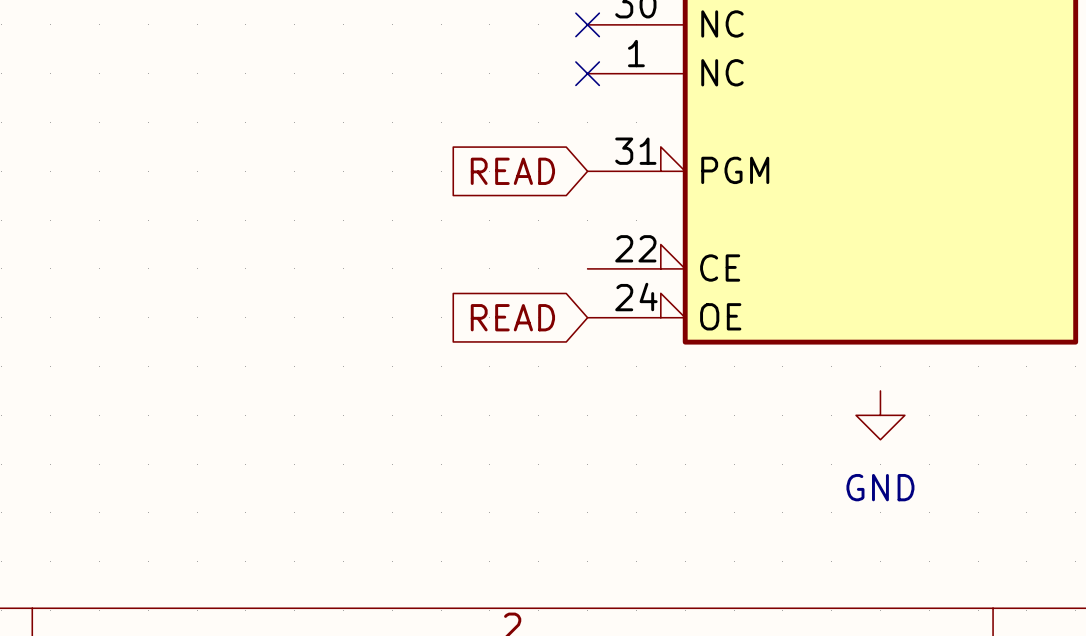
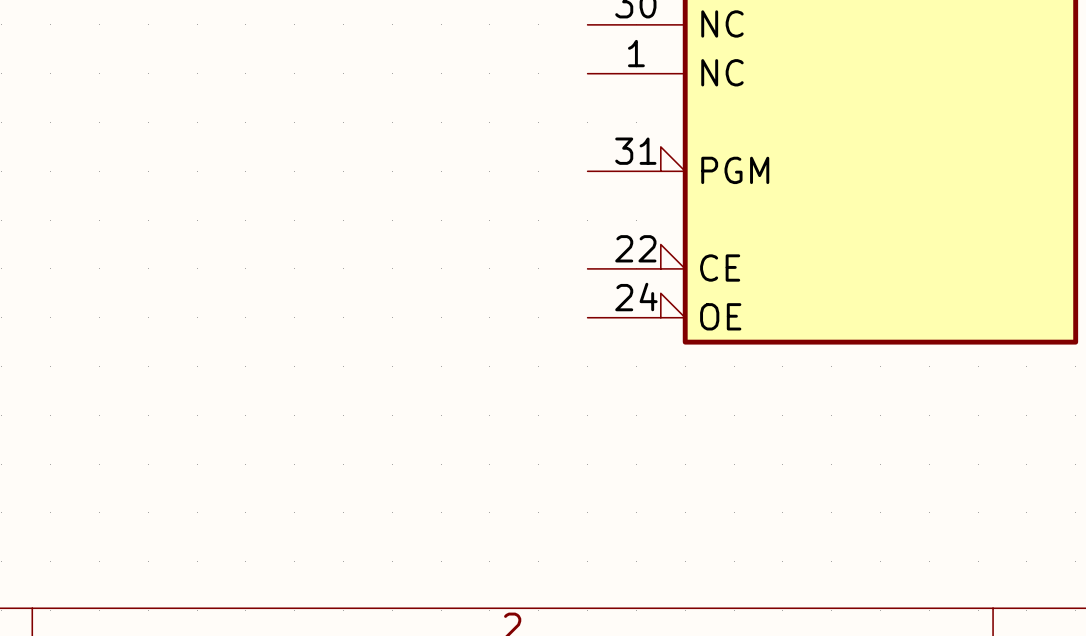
no-connect mark: (587, 24) -> none
no-connect mark: (587, 73) -> none
global label: READ (512, 171) -> none
global label: READ (512, 317) -> none
power symbol: GND (880, 415) -> none

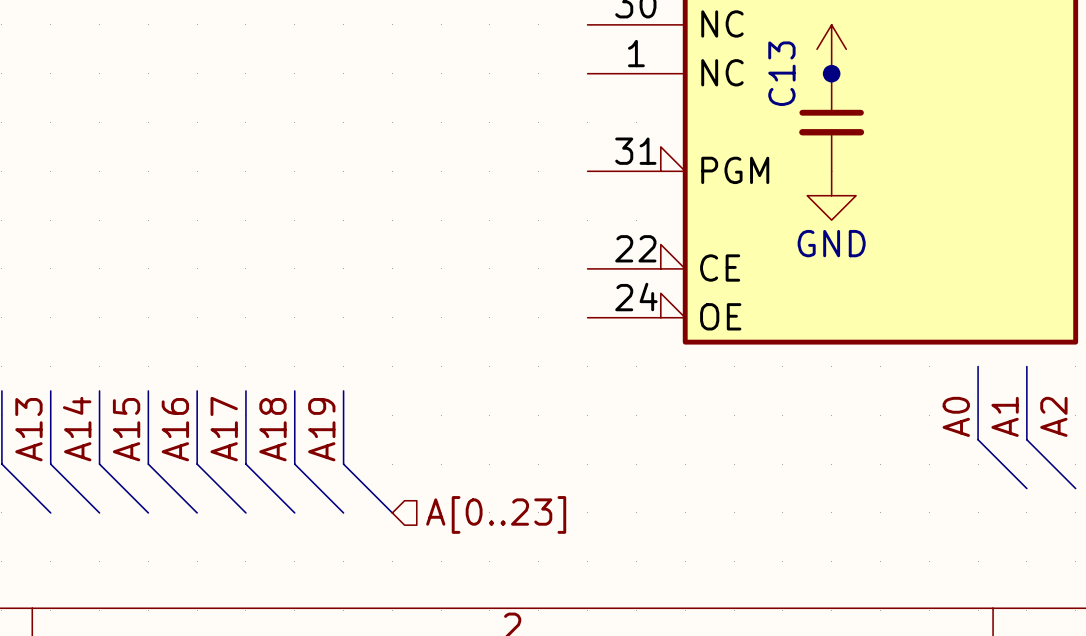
power symbol: none -> (831, 49)
junction: none -> (831, 73)
C13: none -> (831, 122)
power symbol: none -> GND (831, 195)
wire: none -> (978, 366) (978, 439) (1026, 488)
wire: none -> (1026, 366) (1026, 439) (1075, 488)
wire: none -> (1, 390) (1, 464) (50, 512)
wire: none -> (50, 390) (50, 464) (99, 512)
wire: none -> (99, 390) (99, 464) (148, 512)
wire: none -> (148, 390) (148, 464) (197, 512)
wire: none -> (197, 390) (197, 464) (245, 512)
wire: none -> (245, 390) (245, 464) (294, 512)
wire: none -> (294, 390) (294, 464) (343, 512)
wire: none -> (343, 390) (343, 464) (392, 512)
label: none -> A0 (956, 416)
label: none -> A1 (1005, 416)
label: none -> A2 (1053, 416)
label: none -> A13 (28, 429)
label: none -> A14 (77, 429)
label: none -> A15 (126, 429)
label: none -> A16 (175, 429)
label: none -> A17 (224, 429)
label: none -> A18 (272, 429)
label: none -> A19 (321, 429)
hierarchical label: none -> A[0..23] (496, 514)

